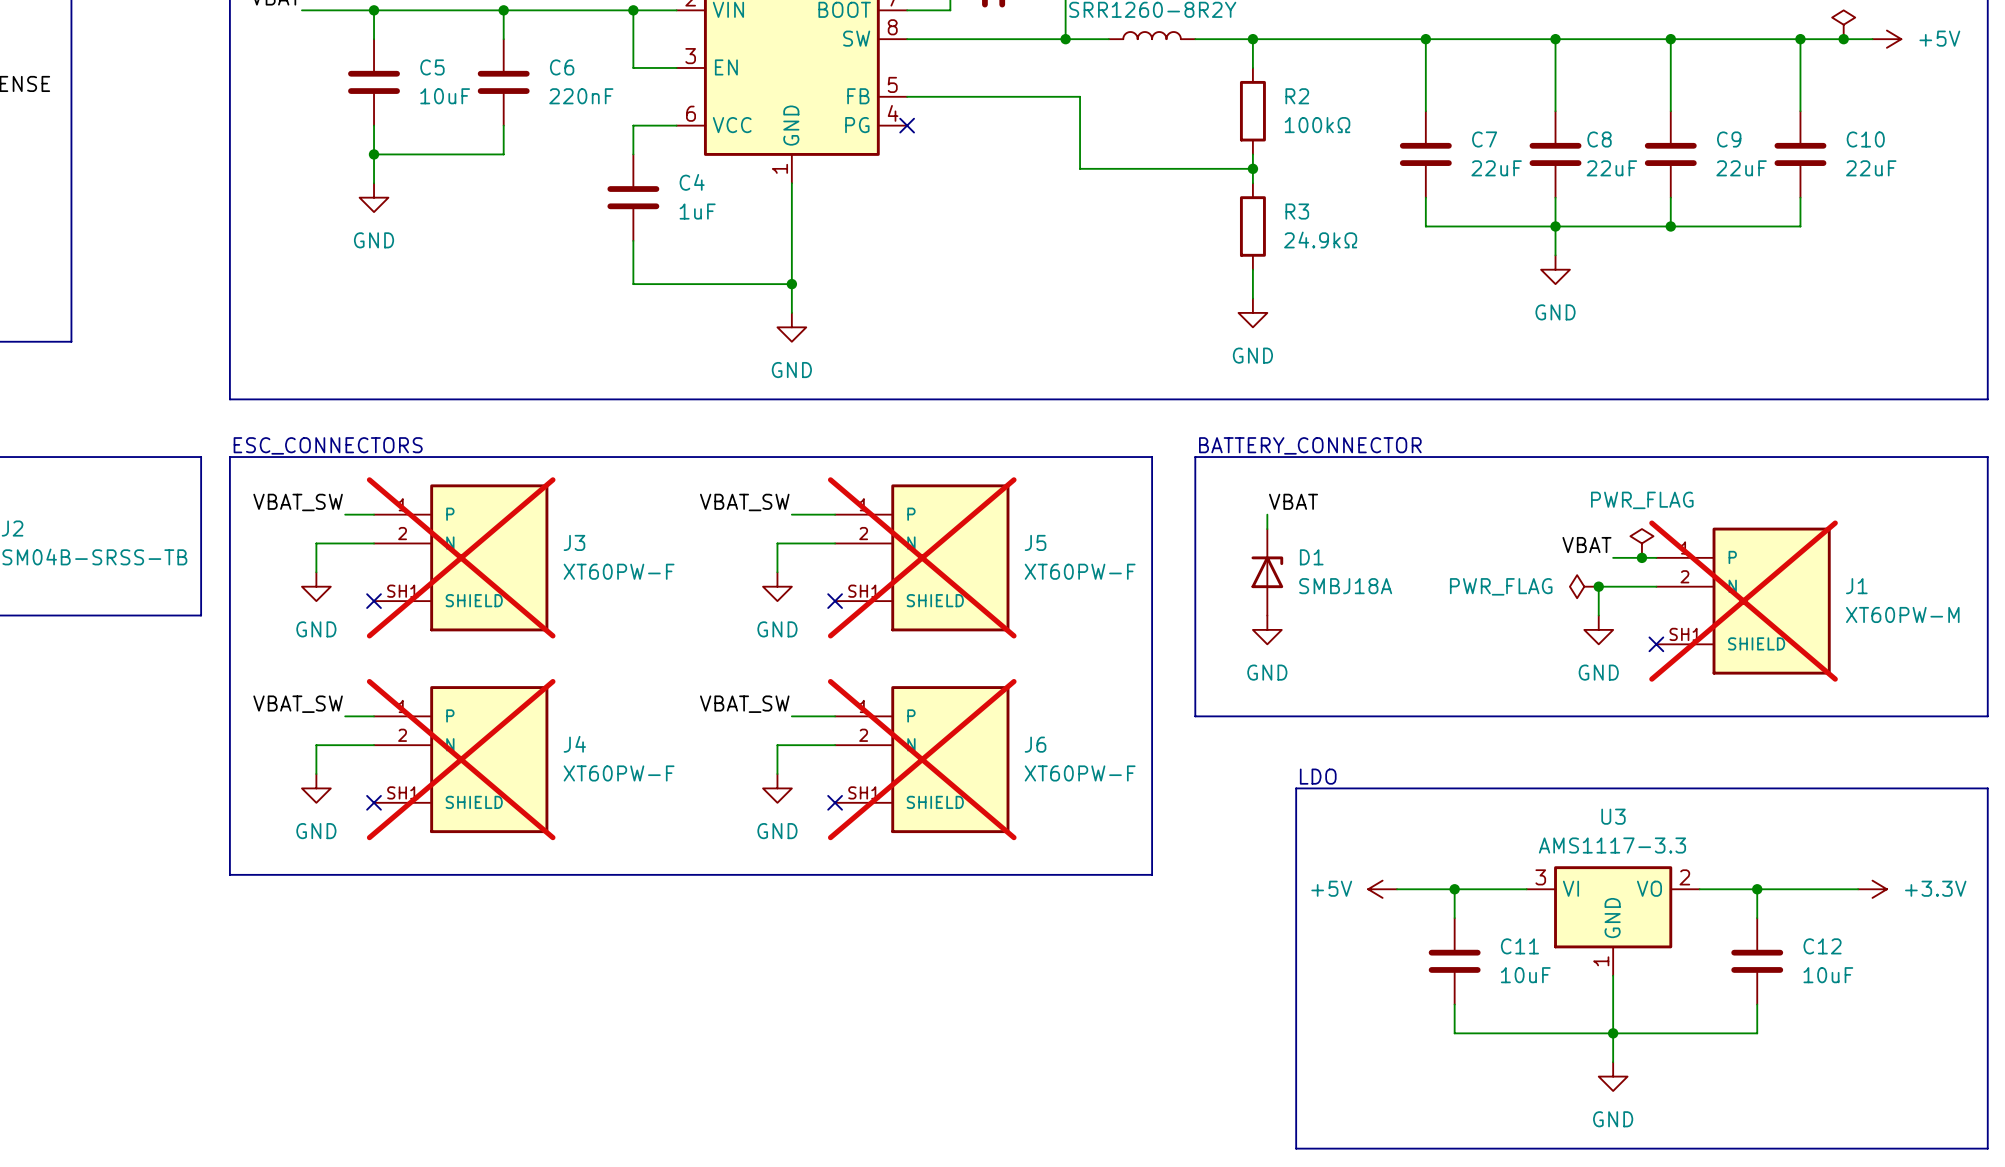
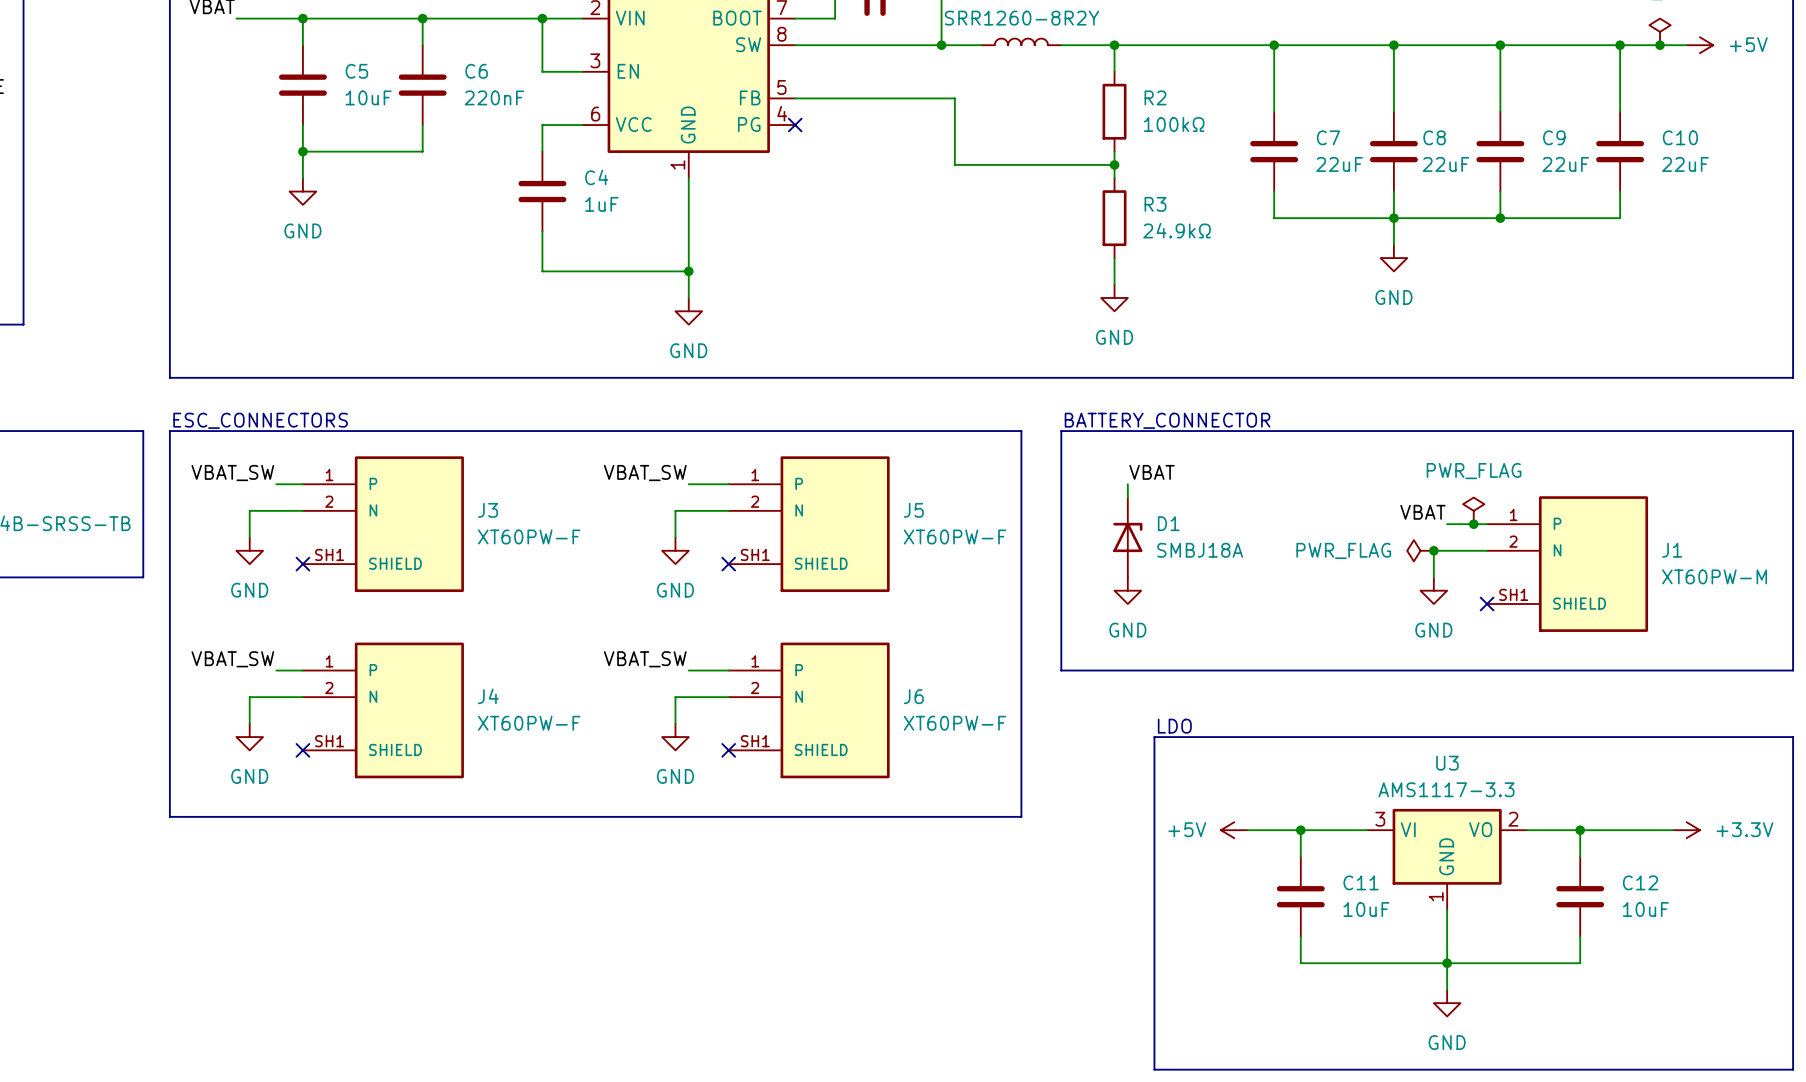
J3 do-not-place cross: (461, 557) -> none
J5 do-not-place cross: (922, 557) -> none
J1 do-not-place cross: (1743, 601) -> none
J4 do-not-place cross: (461, 759) -> none
J6 do-not-place cross: (922, 759) -> none

